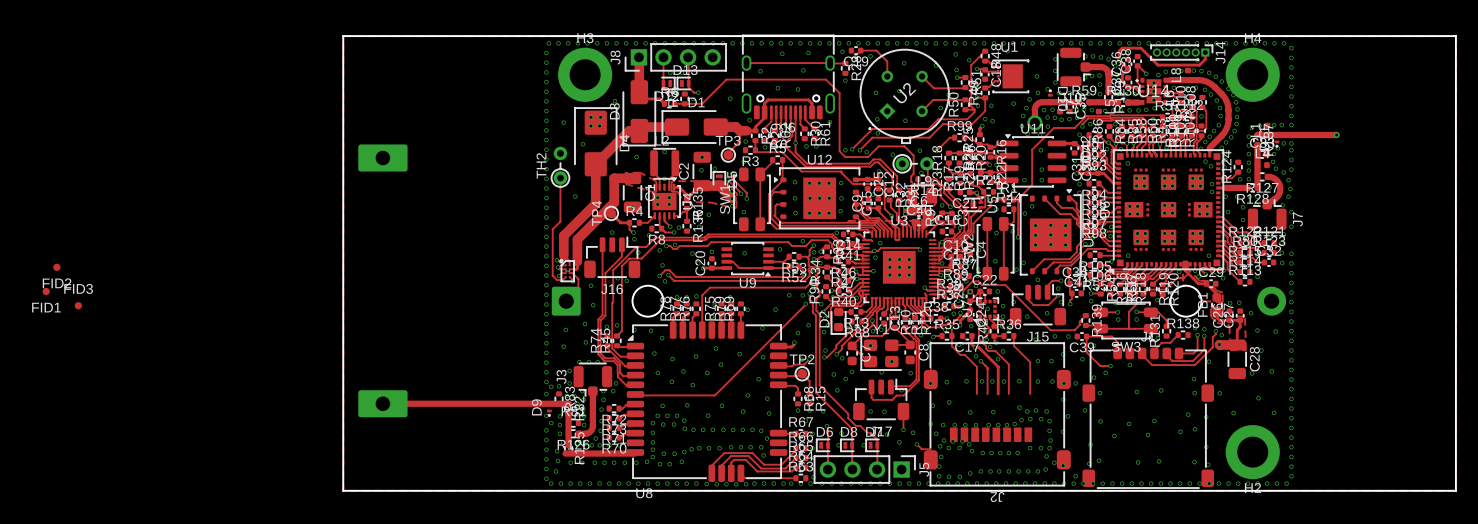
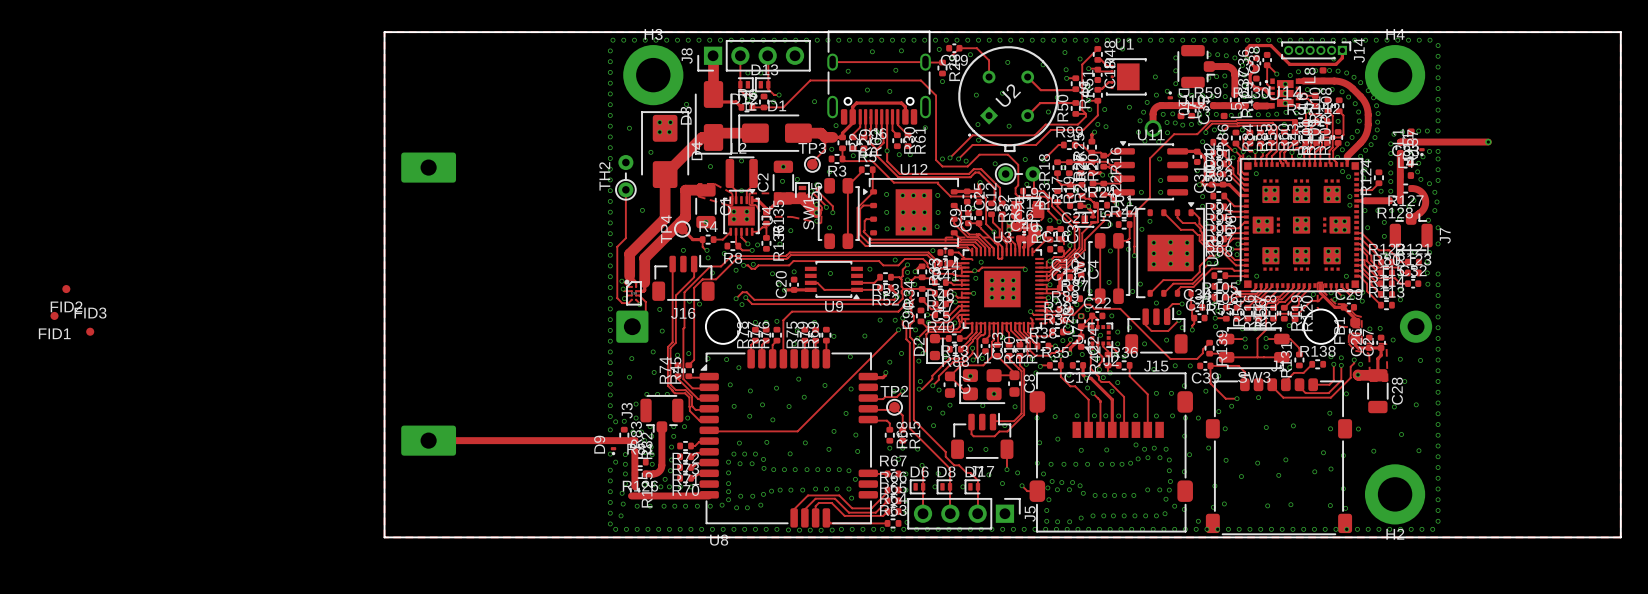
J2 rotation: 0° (997, 414) -> 180° (1111, 452)

